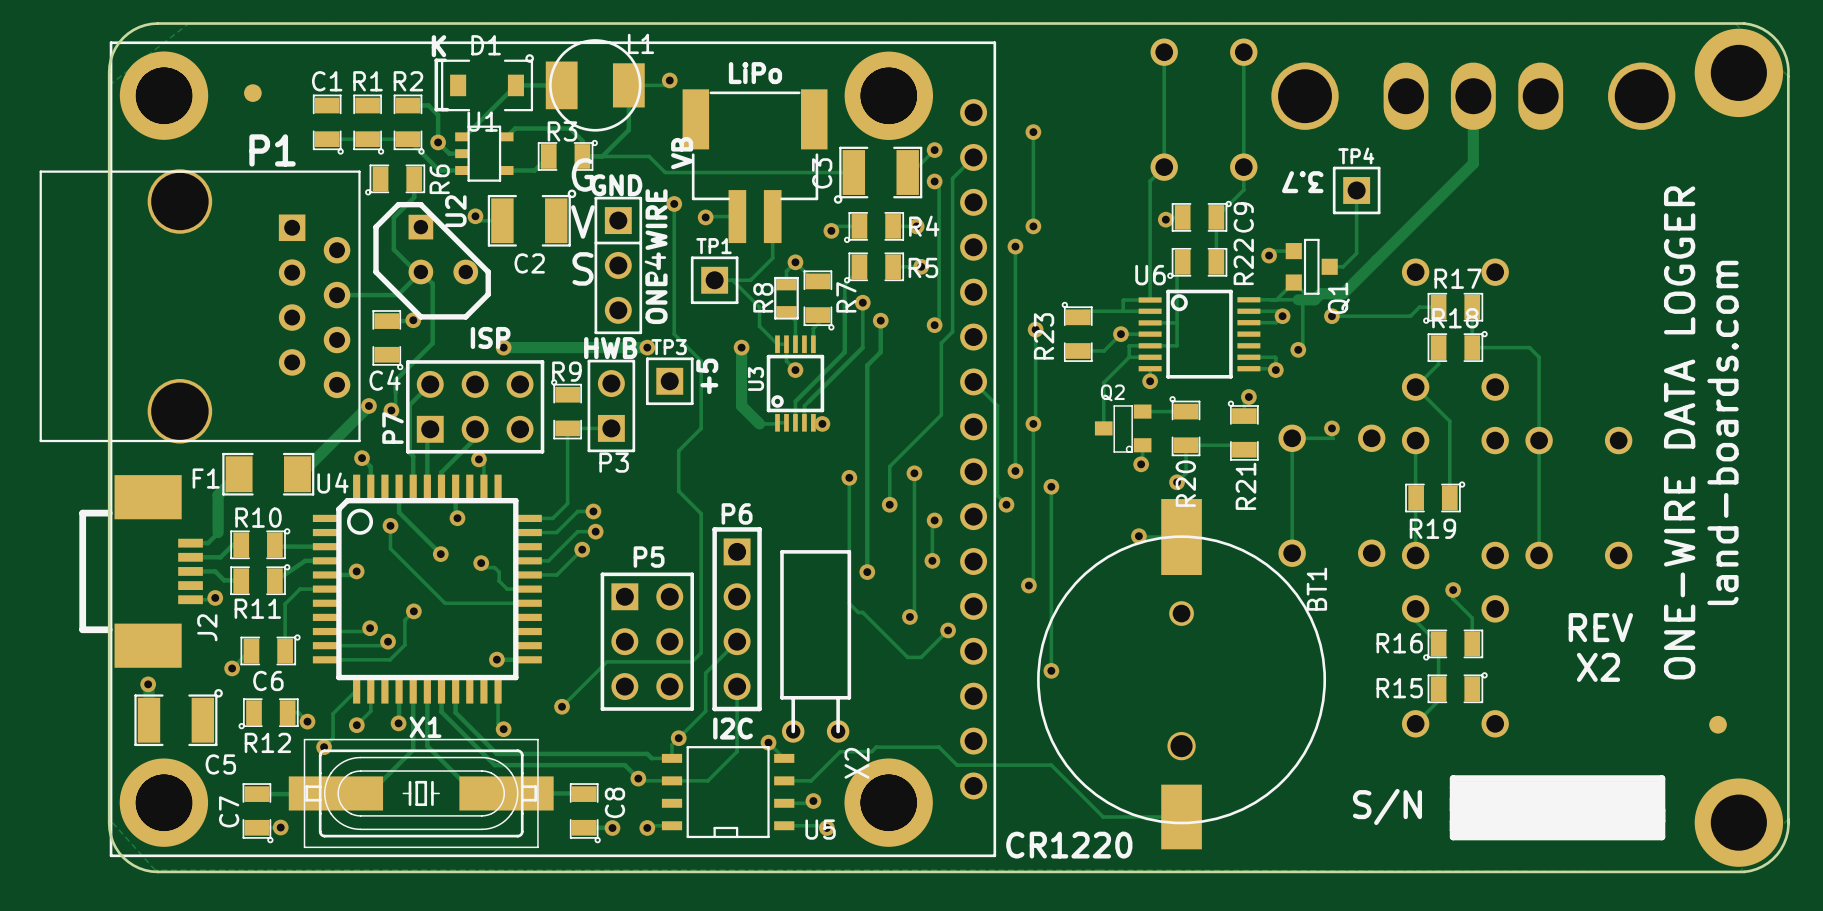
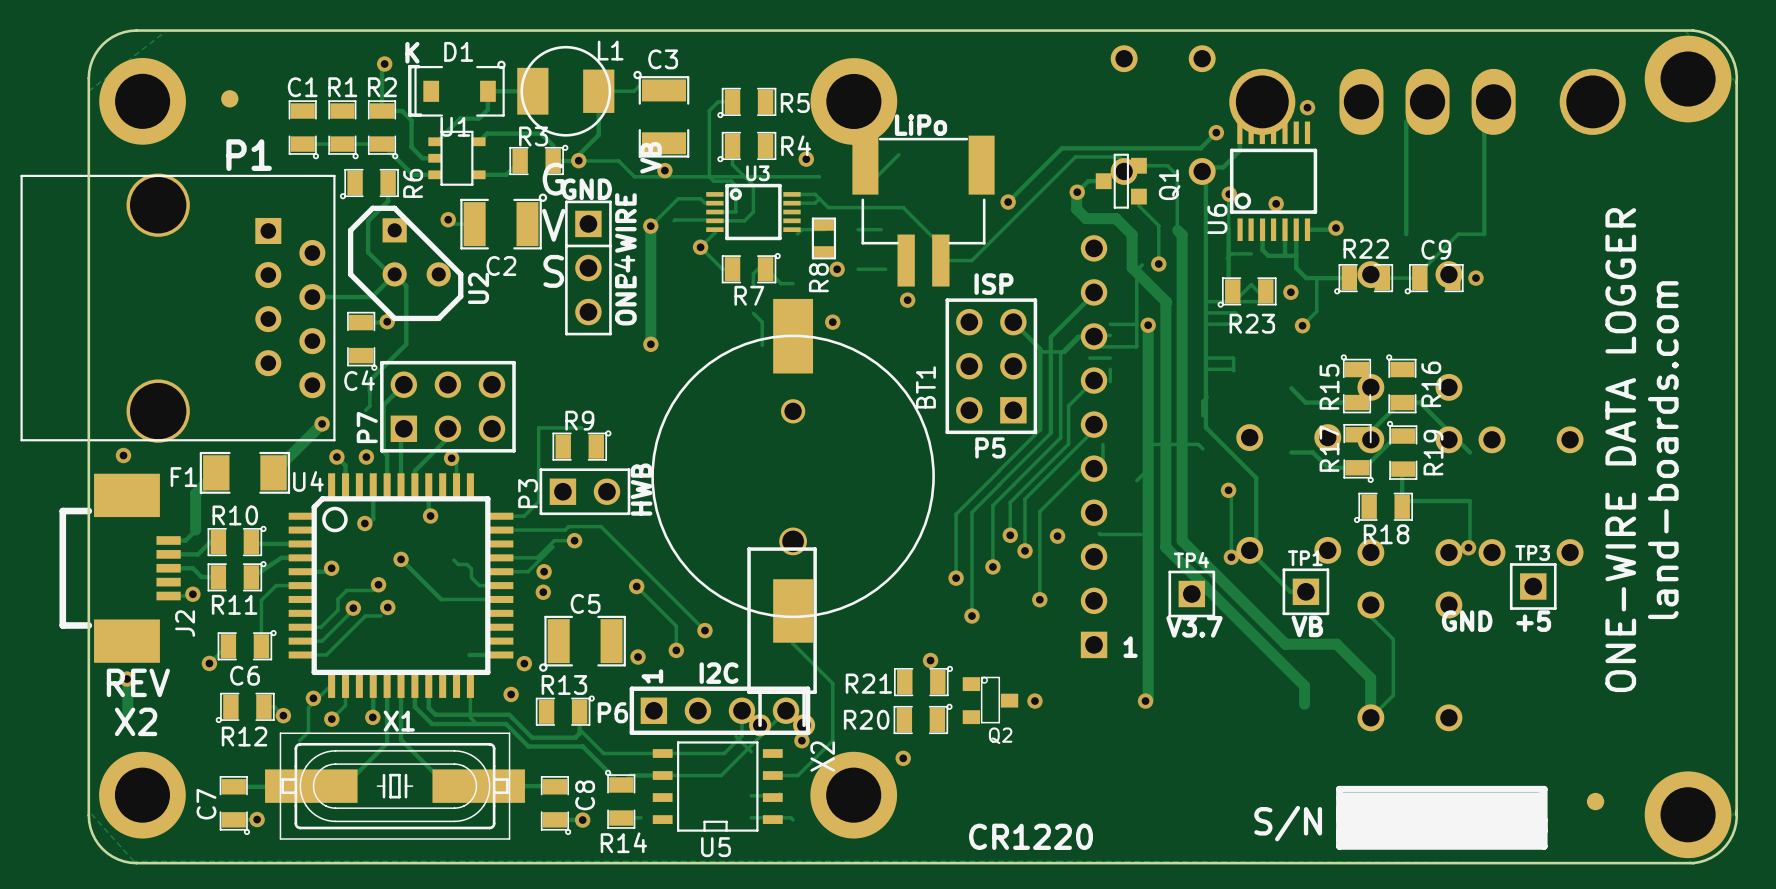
track: (1164, 52) (1164, 167) (1150, 181) (1150, 300) (1123, 300) (1123, 311) -> none
track: (1243, 52) (1243, 189) (1216, 217) (1216, 262) -> none
track: none -> (384, 63) (382, 66) (382, 111)
via: none -> (384, 63)
text position: LiPo (755, 73) -> LiPo (921, 125)
via: (669, 80) -> none
track: (515, 85) (464, 136) -> (487, 91) (487, 109) (478, 118) (460, 118) (437, 141)
track: none -> (732, 101) (718, 101) (709, 110) (709, 176) (713, 181) (731, 181) (735, 185) (735, 212) (714, 212)
track: (1473, 96) (1473, 163) (1343, 293) (1320, 293) (1314, 299) (1298, 299) -> none
via: none -> (1307, 107)
track: none -> (1484, 121) (1484, 234) (1458, 234) (1419, 272) (1419, 278) (1382, 278)
track: none -> (1216, 132) (1200, 148) (1061, 148) (1008, 202)
via: none -> (1216, 132)
track: none -> (1239, 132) (1239, 150) (1223, 167) (1214, 167) (1205, 176) (1205, 427) (1256, 477) (1256, 557) (1290, 591) (1305, 591)
track: (1033, 132) (1033, 226) -> none
via: (1033, 132) -> none
track: none -> (732, 145) (732, 164) (753, 185) (753, 212) (744, 220) (714, 220)
via: (438, 142) -> none
via: (934, 150) -> none
via: none -> (806, 159)
via: none -> (578, 160)
track: (973, 157) (952, 178) (952, 331) (941, 343) (941, 414) (889, 466) (889, 504) -> none
via: none -> (664, 170)
part position: (755, 166) -> (923, 211)
C3 rotation: 0° (878, 175) -> 90° clockwise (661, 114)
C3 position: (878, 175) -> (661, 114)
track: none -> (1103, 181) (1088, 181) (1076, 192) (1076, 209) (1086, 218) (1116, 218) (1132, 234) (1132, 267) (1166, 302) (1165, 547) (1304, 686) (1304, 704)
track: (934, 181) (939, 185) (939, 320) (934, 325) -> none
via: (934, 181) -> none
text: 3.7 (1302, 182) -> none
via: none -> (1077, 192)
track: none -> (791, 194) (815, 194) (828, 207) (903, 207) (940, 245) (940, 260) (971, 260) (1075, 156) (1119, 156) (1127, 165) (1167, 165) (1177, 175) (1177, 230) (1182, 234) (1182, 540) (1285, 644) (1336, 644) (1370, 678) (1370, 704)
track: none -> (1229, 194) (1228, 287) (1232, 291)
via: none -> (1229, 194)
track: (1356, 190) (1356, 253) (1343, 266) (1329, 266) -> none
TP4 position: (1356, 190) -> (1191, 594)
track: none -> (1138, 196) (1138, 205) (1158, 225) (1158, 264)
track: none -> (819, 198) (815, 203) (791, 203)
via: none -> (1008, 202)
track: none -> (714, 203) (704, 203) (700, 198) (678, 198) (650, 226) (650, 344)
via: none -> (1276, 203)
track: (674, 203) (674, 334) (701, 361) (701, 428) (678, 450) (678, 491) (701, 513) (701, 652) (692, 661) (606, 661) (562, 706) -> none
via: (674, 203) -> none
U2 name position: U2 (455, 211) -> U2 (478, 288)
track: (772, 216) (772, 258) (750, 280) (714, 280) -> none
C9 rotation: 0° (1201, 216) -> 180° (1434, 279)
C9 position: (1201, 216) -> (1434, 279)
via: (705, 217) -> none
C9 name position: C9 (1243, 217) -> C9 (1436, 249)
via: (1165, 219) -> none
via: none -> (650, 226)
track: none -> (1336, 228) (1334, 229) (1307, 229)
via: none -> (1336, 228)
track: none -> (714, 229) (714, 232) (700, 247) (722, 269) (732, 269)
via: (916, 226) -> none
via: (1033, 226) -> none
track: none -> (1262, 229) (1262, 250) (1268, 255) (1296, 255)
track: none -> (1285, 229) (1285, 255)
track: none -> (1296, 229) (1296, 268) (1306, 278) (1349, 278) (1316, 278) (1316, 311) (1302, 325)
R4 position: (874, 227) -> (746, 147)
via: (831, 230) -> none
via: none -> (700, 247)
track: (1015, 246) (1015, 471) -> none
via: (1015, 246) -> none
via: (1269, 255) -> none
via: none -> (1158, 264)
R22 name rotation: 0° (1243, 261) -> 90° clockwise (1366, 248)
via: (795, 262) -> none
R22 position: (1197, 263) -> (1363, 279)
track: (859, 266) (859, 270) (844, 284) (844, 352) (795, 401) (795, 422) -> none
via: none -> (837, 269)
via: (921, 266) -> none
Q1 rotation: 0° (1311, 266) -> 180° (1121, 181)
Q1 position: (1311, 266) -> (1121, 181)
R5 position: (874, 267) -> (746, 102)
via: none -> (1475, 278)
TP1 position: (714, 280) -> (1305, 591)
track: (732, 280) (759, 307) (759, 326) (777, 344) (786, 344) (786, 361) (795, 370) -> none
text: none -> ISP (993, 284)
track: none -> (1094, 292) (1050, 337) (1050, 433) (971, 512) (971, 616)
via: none -> (1290, 292)
R8 name position: R8 (763, 297) -> R8 (818, 277)
R7 name position: R7 (846, 297) -> R7 (749, 295)
R8 position: (786, 298) -> (823, 238)
via: none -> (907, 300)
track: (1302, 298) (1302, 345) (1298, 349) -> none
Q1 name position: Q1 (1338, 298) -> Q1 (1169, 184)
R7 rotation: 0° (819, 300) -> 90° counterclockwise (751, 268)
R7 position: (819, 300) -> (751, 268)
track: (862, 302) (862, 347) (804, 405) (804, 422) -> none
via: (862, 302) -> none
track: (1438, 307) (1419, 307) (1410, 316) (1331, 316) -> none
track: (1472, 307) (1472, 347) (1529, 347) (1539, 357) (1539, 555) -> none
R17 rotation: 0° (1453, 308) -> 90° counterclockwise (1358, 453)
R17 position: (1453, 308) -> (1358, 453)
track: (1150, 311) (1084, 311) (1078, 317) -> none
via: (1282, 316) -> none
via position: (1331, 316) -> (1302, 325)
track: (880, 320) (880, 352) (867, 365) (867, 572) -> none
via position: (880, 320) -> (832, 322)
track: none -> (1013, 322) (1040, 349) (1040, 429) (956, 514) (956, 578)
track: none -> (1148, 325) (1148, 698) (1145, 701)
via: none -> (1148, 325)
via: (934, 325) -> none
track: (1035, 329) (1033, 581) (1028, 585) -> none
via: (1035, 329) -> none
R23 rotation: 0° (1077, 331) -> 90° counterclockwise (1247, 292)
R23 position: (1077, 331) -> (1247, 292)
via: (1120, 334) -> none
U6 rotation: 0° (1199, 334) -> 90° counterclockwise (1273, 181)
U6 position: (1199, 334) -> (1273, 181)
track: none -> (1094, 336) (1077, 336) (1060, 353) (1060, 437) (1013, 484)
text: ISP (490, 337) -> none
via: none -> (650, 344)
track: (1129, 346) (1129, 357) (1103, 382) (1103, 428) -> none
R18 rotation: 0° (1457, 346) -> 180° (1383, 507)
R18 position: (1457, 346) -> (1383, 507)
track: (503, 347) (647, 347) -> none
via: (503, 347) -> none
via: (647, 347) -> none
track: (741, 347) (741, 405) (759, 423) (786, 422) -> none
via: (741, 347) -> none
track: (1438, 347) (1438, 364) (1415, 387) (1449, 421) (1449, 498) -> none
text rotation: 0° (610, 348) -> 90° counterclockwise (641, 489)
text position: HWB (610, 348) -> HWB (641, 489)
via: (1298, 349) -> none
via: (795, 370) -> none
via: (1275, 370) -> none
text: +5 (707, 376) -> none
track: none -> (1094, 380) (1068, 405) (1068, 444) (1010, 502) (1010, 535)
TP3 position: (669, 381) -> (1533, 586)
track: (973, 381) (997, 405) (997, 495) (1006, 504) -> none
via: (1150, 381) -> none
U3 rotation: 0° (795, 383) -> 90° clockwise (753, 212)
U3 position: (795, 383) -> (753, 212)
track: none -> (1291, 388) (1305, 402) (1357, 402)
via: (1248, 396) -> none
track: (368, 405) (300, 474) (297, 474) -> (322, 423) (273, 472)
via: (368, 405) -> none
P3 rotation: 0° (611, 405) -> 90° clockwise (584, 491)
P3 position: (611, 405) -> (584, 491)
R9 rotation: 0° (566, 409) -> 90° clockwise (581, 445)
R9 position: (566, 409) -> (581, 445)
via: (391, 410) -> none
track: (1142, 411) (1186, 411) -> none
via: (822, 423) -> none
via: (1033, 423) -> none
via: none -> (322, 423)
track: none -> (1094, 424) (1094, 430) (1025, 499) (1025, 550)
R20 rotation: 0° (1184, 426) -> 90° clockwise (923, 718)
R20 position: (1184, 426) -> (923, 718)
Q2 rotation: 0° (1123, 428) -> 180° (990, 700)
Q2 position: (1123, 428) -> (990, 700)
track: (1331, 428) (1333, 438) (1292, 438) (1292, 553) -> none
via: (1331, 428) -> none
R21 rotation: 0° (1243, 430) -> 90° clockwise (923, 681)
R21 position: (1243, 430) -> (923, 681)
text position: ONE-WIRE DATA LOGGER (1679, 432) -> ONE-WIRE DATA LOGGER (1620, 450)
text position: land-boards.com (1723, 432) -> land-boards.com (1663, 450)
track: none -> (1357, 434) (1367, 434) (1399, 402) (1420, 402) (1470, 452)
track: none -> (1403, 436) (1396, 436) (1364, 467) (1328, 467) (1312, 452) (1291, 452)
track: (1415, 440) (1415, 555) -> (1406, 121) (1406, 234)
part: none -> (1094, 446)
part: (552, 449) -> none
via: none -> (123, 455)
via: none -> (366, 457)
via: (1141, 464) -> none
track: none -> (1094, 468) (1082, 468) (1039, 511) (1039, 599)
track: none -> (1403, 469) (1402, 506) (1407, 501) (1470, 501) (1468, 547)
via: (1015, 471) -> none
track: (914, 473) (914, 612) (909, 616) -> none
via: (914, 473) -> none
track: (849, 477) (849, 603) (858, 612) (862, 612) (907, 657) (921, 657) (948, 630) -> none
via: (849, 477) -> none
via: (1177, 482) -> none
track: (1051, 486) (1051, 670) -> (1013, 484) (992, 505) (992, 566)
via: (1051, 486) -> none
track: none -> (1228, 490) (1231, 493) (1231, 557)
via: none -> (1228, 490)
R19 rotation: 0° (1435, 496) -> 90° counterclockwise (1402, 450)
R19 position: (1435, 496) -> (1402, 450)
via: (889, 504) -> none
via: (1006, 504) -> none
track: (593, 511) (577, 511) (556, 532) -> (704, 630) (601, 526) (568, 526) (565, 530) (527, 530)
via: (593, 511) -> none
track: (399, 512) (440, 554) -> (373, 510) (372, 519)
track: (934, 520) (932, 522) (932, 560) -> none
via: (934, 520) -> none
track: (390, 525) (390, 548) (445, 603) (468, 603) -> (401, 559) (441, 599)
track: (595, 531) (577, 531) (548, 560) -> (574, 540) (554, 540) (537, 557) (519, 557)
via position: (595, 531) -> (574, 540)
via: (1138, 536) -> none
via: none -> (1010, 535)
via: none -> (1057, 536)
via: (582, 549) -> none
via: none -> (1025, 550)
via position: (440, 554) -> (401, 559)
via: (932, 560) -> none
via: none -> (1231, 557)
via: (481, 563) -> none
via: (867, 572) -> none
via: none -> (544, 571)
via: none -> (956, 578)
via position: (1028, 585) -> (992, 566)
via: none -> (378, 584)
track: none -> (636, 586) (676, 626) (676, 650)
via: none -> (636, 586)
track: (1453, 590) (1453, 599) (1472, 618) (1472, 643) -> none
via position: (1453, 590) -> (1468, 547)
via: none -> (543, 592)
via: none -> (1039, 599)
track: (413, 611) (404, 620) (404, 645) (390, 659) (351, 659) -> (381, 615) (365, 615) (326, 654)
via: none -> (353, 608)
track: none -> (793, 610) (793, 643) (832, 683) (832, 740) (797, 775) (772, 775)
via: (909, 616) -> none
P6 rotation: 0° (737, 619) -> 90° counterclockwise (719, 710)
via: none -> (971, 616)
text: none -> GND (1467, 621)
text: none -> +5 (1533, 621)
text: REV (1600, 627) -> none
track: (370, 628) (366, 631) (345, 631) -> (378, 584) (372, 590) (346, 590) (337, 599) (337, 610) (321, 627)
via: (370, 628) -> none
via: (948, 630) -> none
text: none -> VB (1307, 626)
text: none -> V3.7 (1194, 626)
via: none -> (704, 630)
track: (388, 641) (384, 645) (346, 645) -> (353, 608) (322, 641)
via: (388, 641) -> none
P5 rotation: 0° (647, 641) -> 180° (991, 366)
P5 position: (647, 641) -> (991, 366)
track: (737, 641) (705, 673) (705, 711) (672, 744) (672, 758) (651, 758) (647, 753) (496, 753) (455, 712) -> (741, 710) (741, 735) (724, 753) (603, 753) (579, 729) (579, 711) (579, 733) (575, 737) (532, 737) (509, 714) (435, 714) (428, 706)
R16 name position: R16 (1399, 643) -> R16 (1431, 384)
R16 rotation: 0° (1453, 645) -> 90° clockwise (1401, 383)
R16 position: (1453, 645) -> (1401, 383)
text: none -> 1 (1130, 647)
via: none -> (676, 650)
via: (496, 659) -> none
via: none -> (638, 657)
via: none -> (930, 660)
text: X2 (1598, 667) -> none
via: none -> (524, 663)
via: (1051, 670) -> none
BT1 position: (1181, 674) -> (793, 470)
text: none -> 1 (652, 676)
track: (737, 686) (737, 751) (707, 780) (640, 780) (624, 765) (494, 765) (441, 711) -> (786, 710) (721, 775) (630, 775) (621, 784) (582, 746) (528, 746) (506, 724) (432, 724) (414, 706)
R15 rotation: 0° (1457, 687) -> 90° counterclockwise (1355, 383)
R15 position: (1457, 687) -> (1355, 383)
text: none -> REV (138, 682)
via: none -> (511, 694)
via: none -> (313, 698)
via: (562, 706) -> none
via: none -> (1034, 701)
via: none -> (1145, 701)
R13: none -> (565, 710)
C5 rotation: 0° (178, 717) -> 180° (582, 643)
C5 position: (178, 717) -> (582, 643)
part position: (1718, 724) -> (1595, 801)
text: none -> X2 (136, 721)
text position: I2C (733, 728) -> I2C (719, 673)
via: (503, 729) -> none
via: (678, 738) -> none
via: (768, 742) -> none
via: (324, 747) -> none
via: none -> (801, 740)
C5 name position: C5 (220, 764) -> C5 (585, 603)
via: none -> (903, 758)
via: (638, 778) -> none
track: (784, 780) (811, 780) (840, 751) (871, 751) (876, 747) (939, 747) (957, 765) (1051, 765) (1103, 816) (1181, 816) -> none
U5 position: (728, 792) -> (717, 786)
via: (813, 801) -> none
R14: none -> (620, 799)
text position: S/N (1387, 806) -> S/N (1288, 823)
drawing position: (1557, 807) -> (1441, 817)
via: (647, 827) -> none
via: (826, 827) -> none
U5 name position: U5 (820, 829) -> U5 (715, 847)

